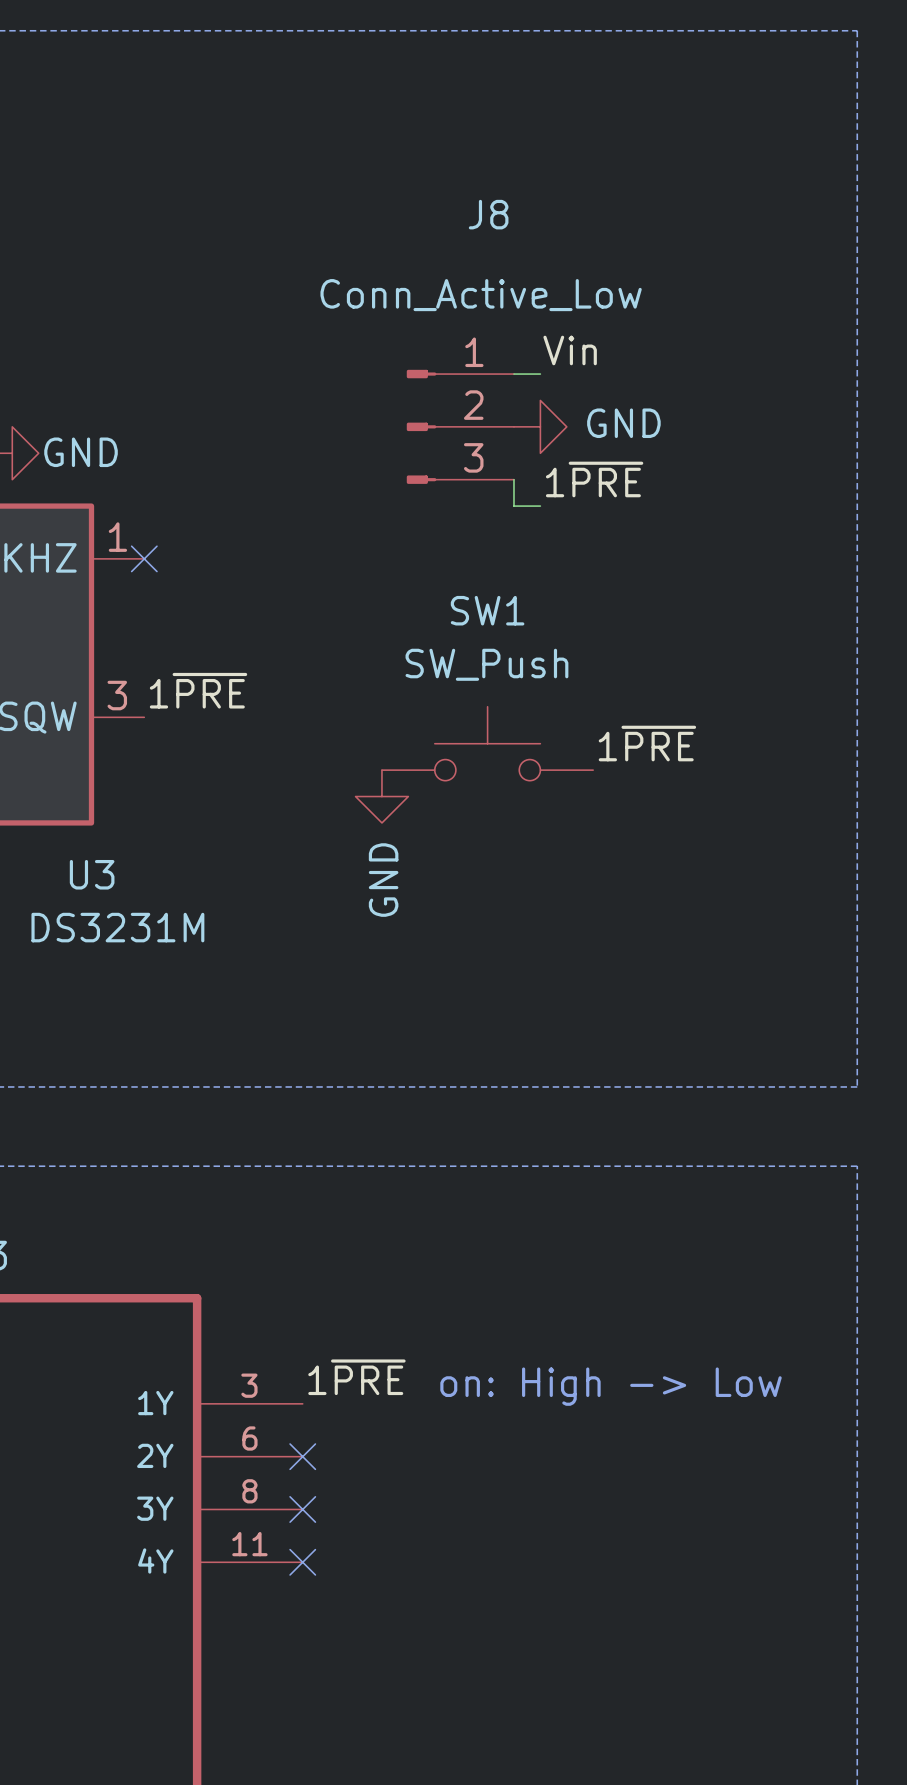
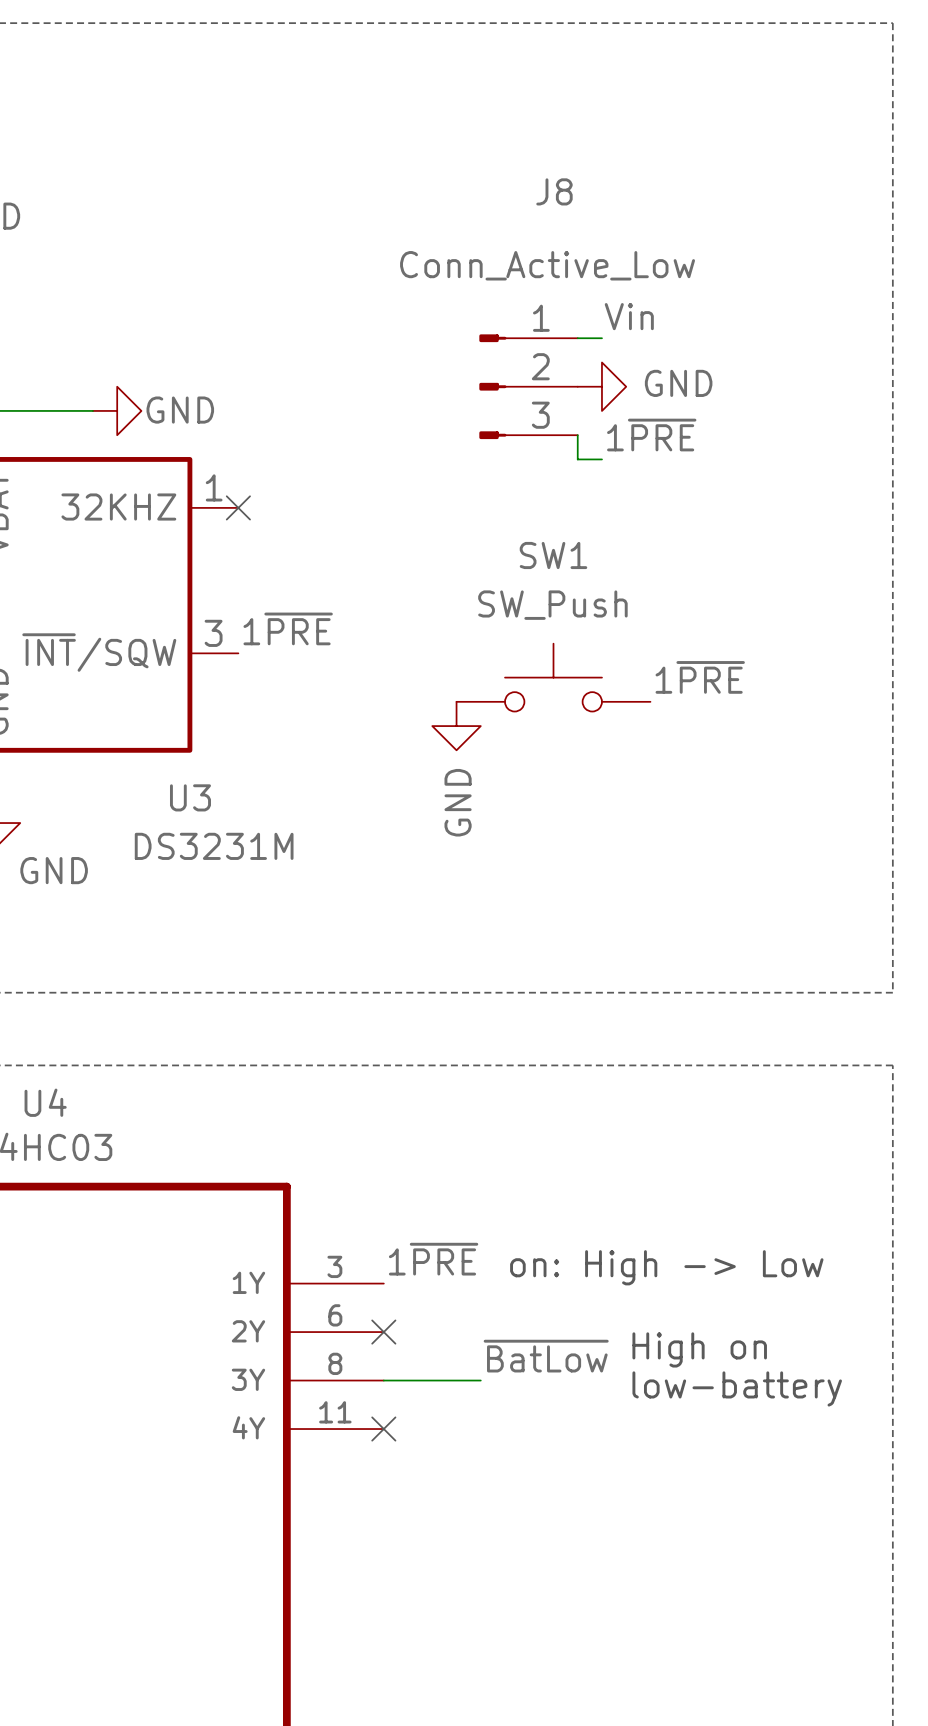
text: none -> High on (699, 1349)
label: none -> ~{BatLow} (546, 1356)
wire: none -> (383, 1380) (480, 1380)
no-connect mark: (302, 1509) -> none
text: none -> low-battery (737, 1388)

